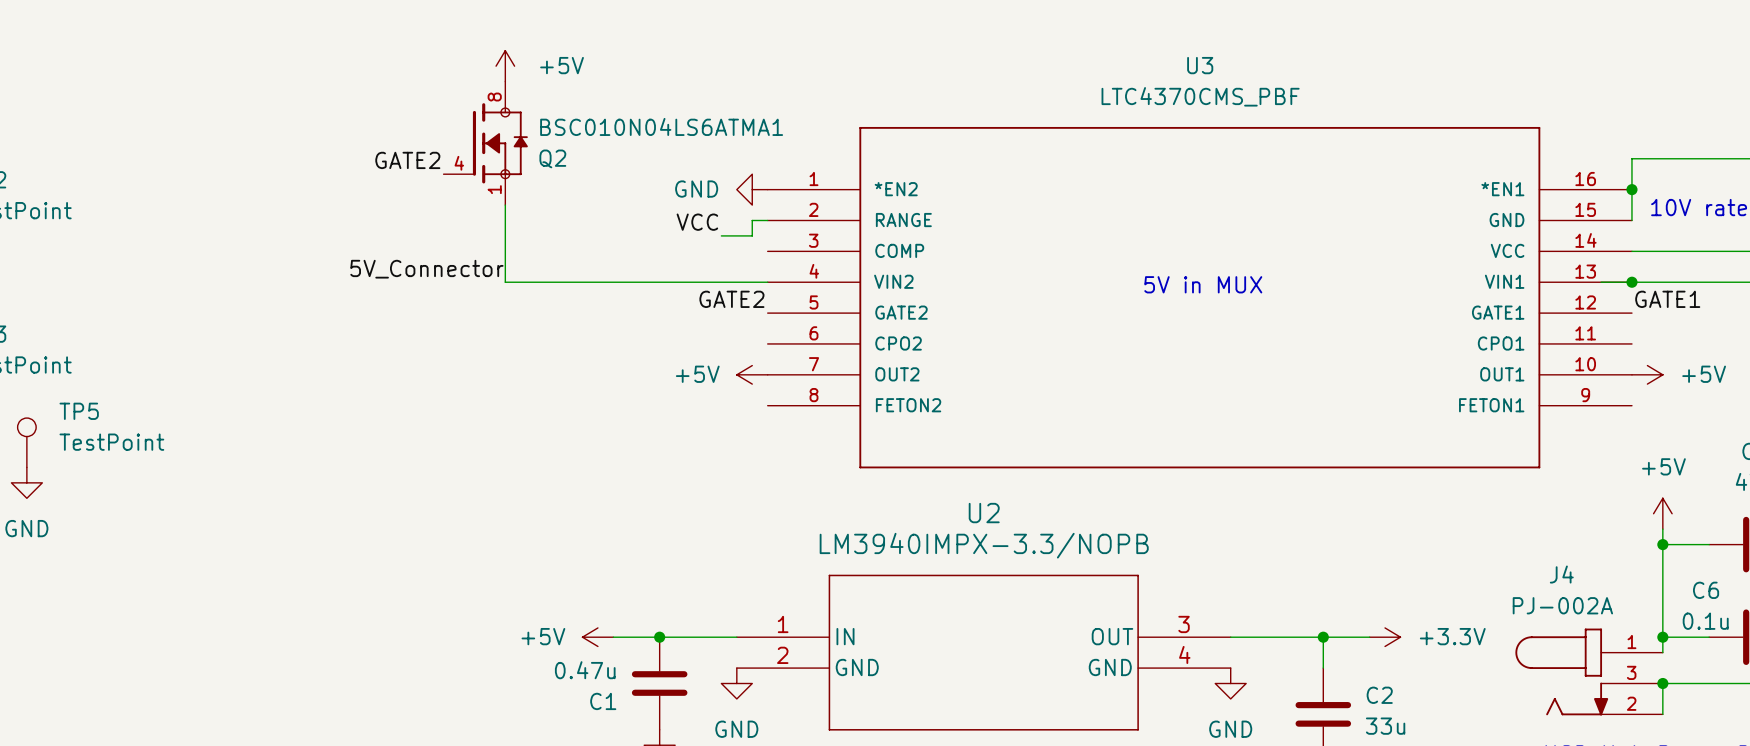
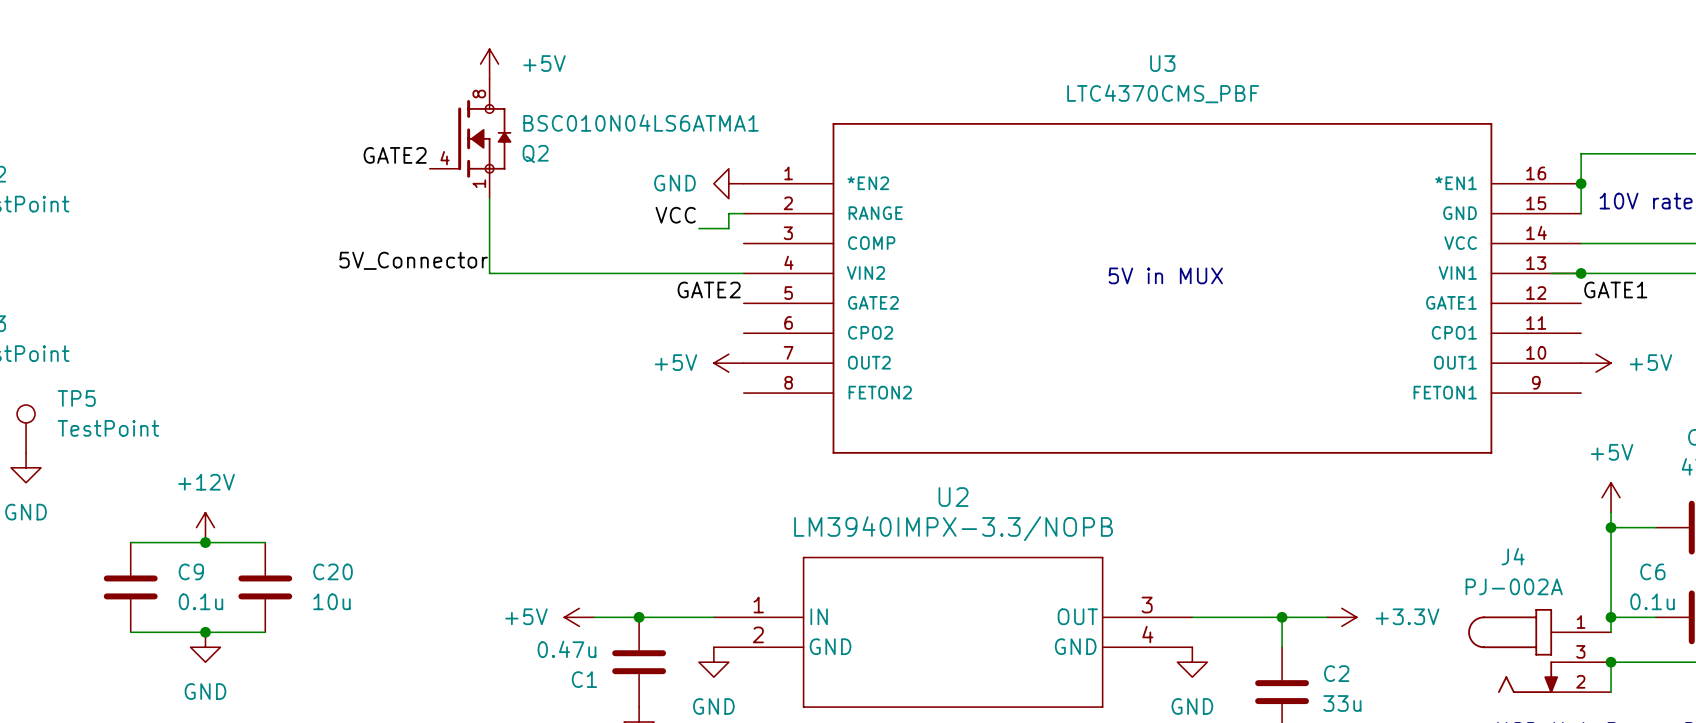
power symbol: none -> +12V (205, 527)
wire: none -> (130, 542) (265, 542)
junction: none -> (205, 542)
C9: none -> 0.1u (130, 587)
C20: none -> 10u (265, 587)
wire: none -> (130, 632) (265, 632)
junction: none -> (205, 632)
power symbol: none -> GND (205, 647)

